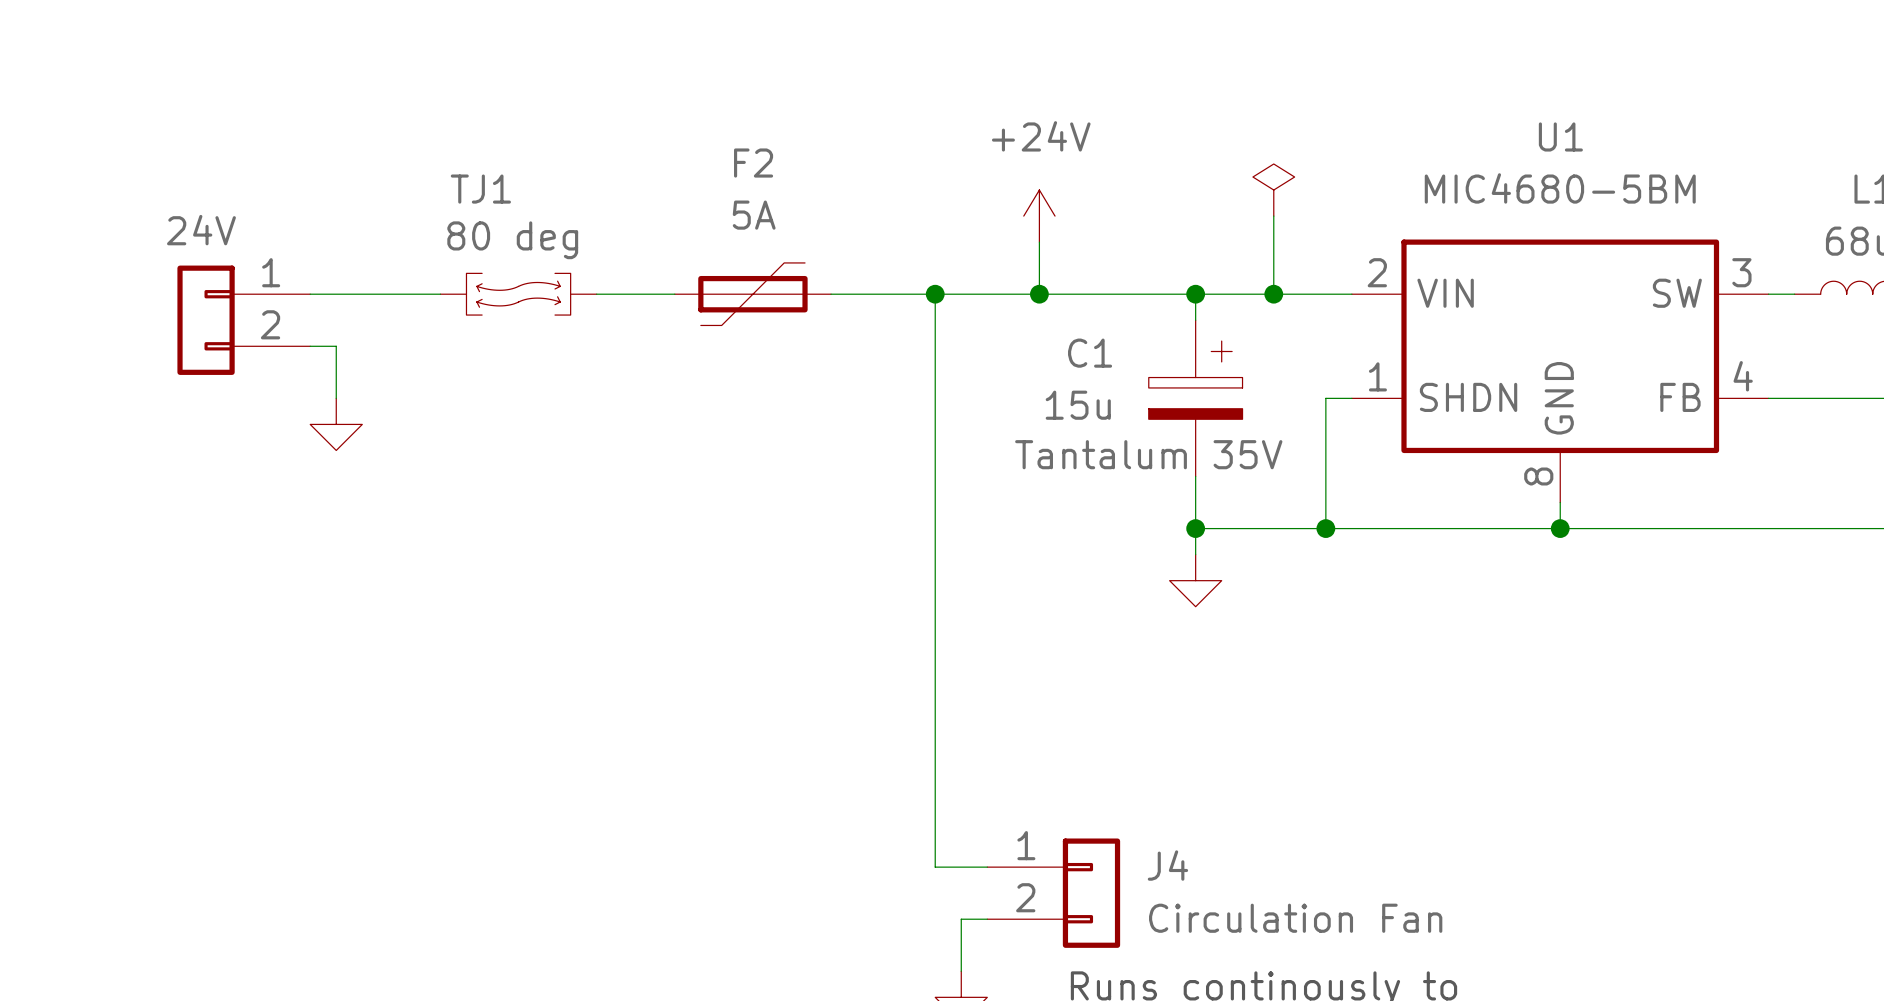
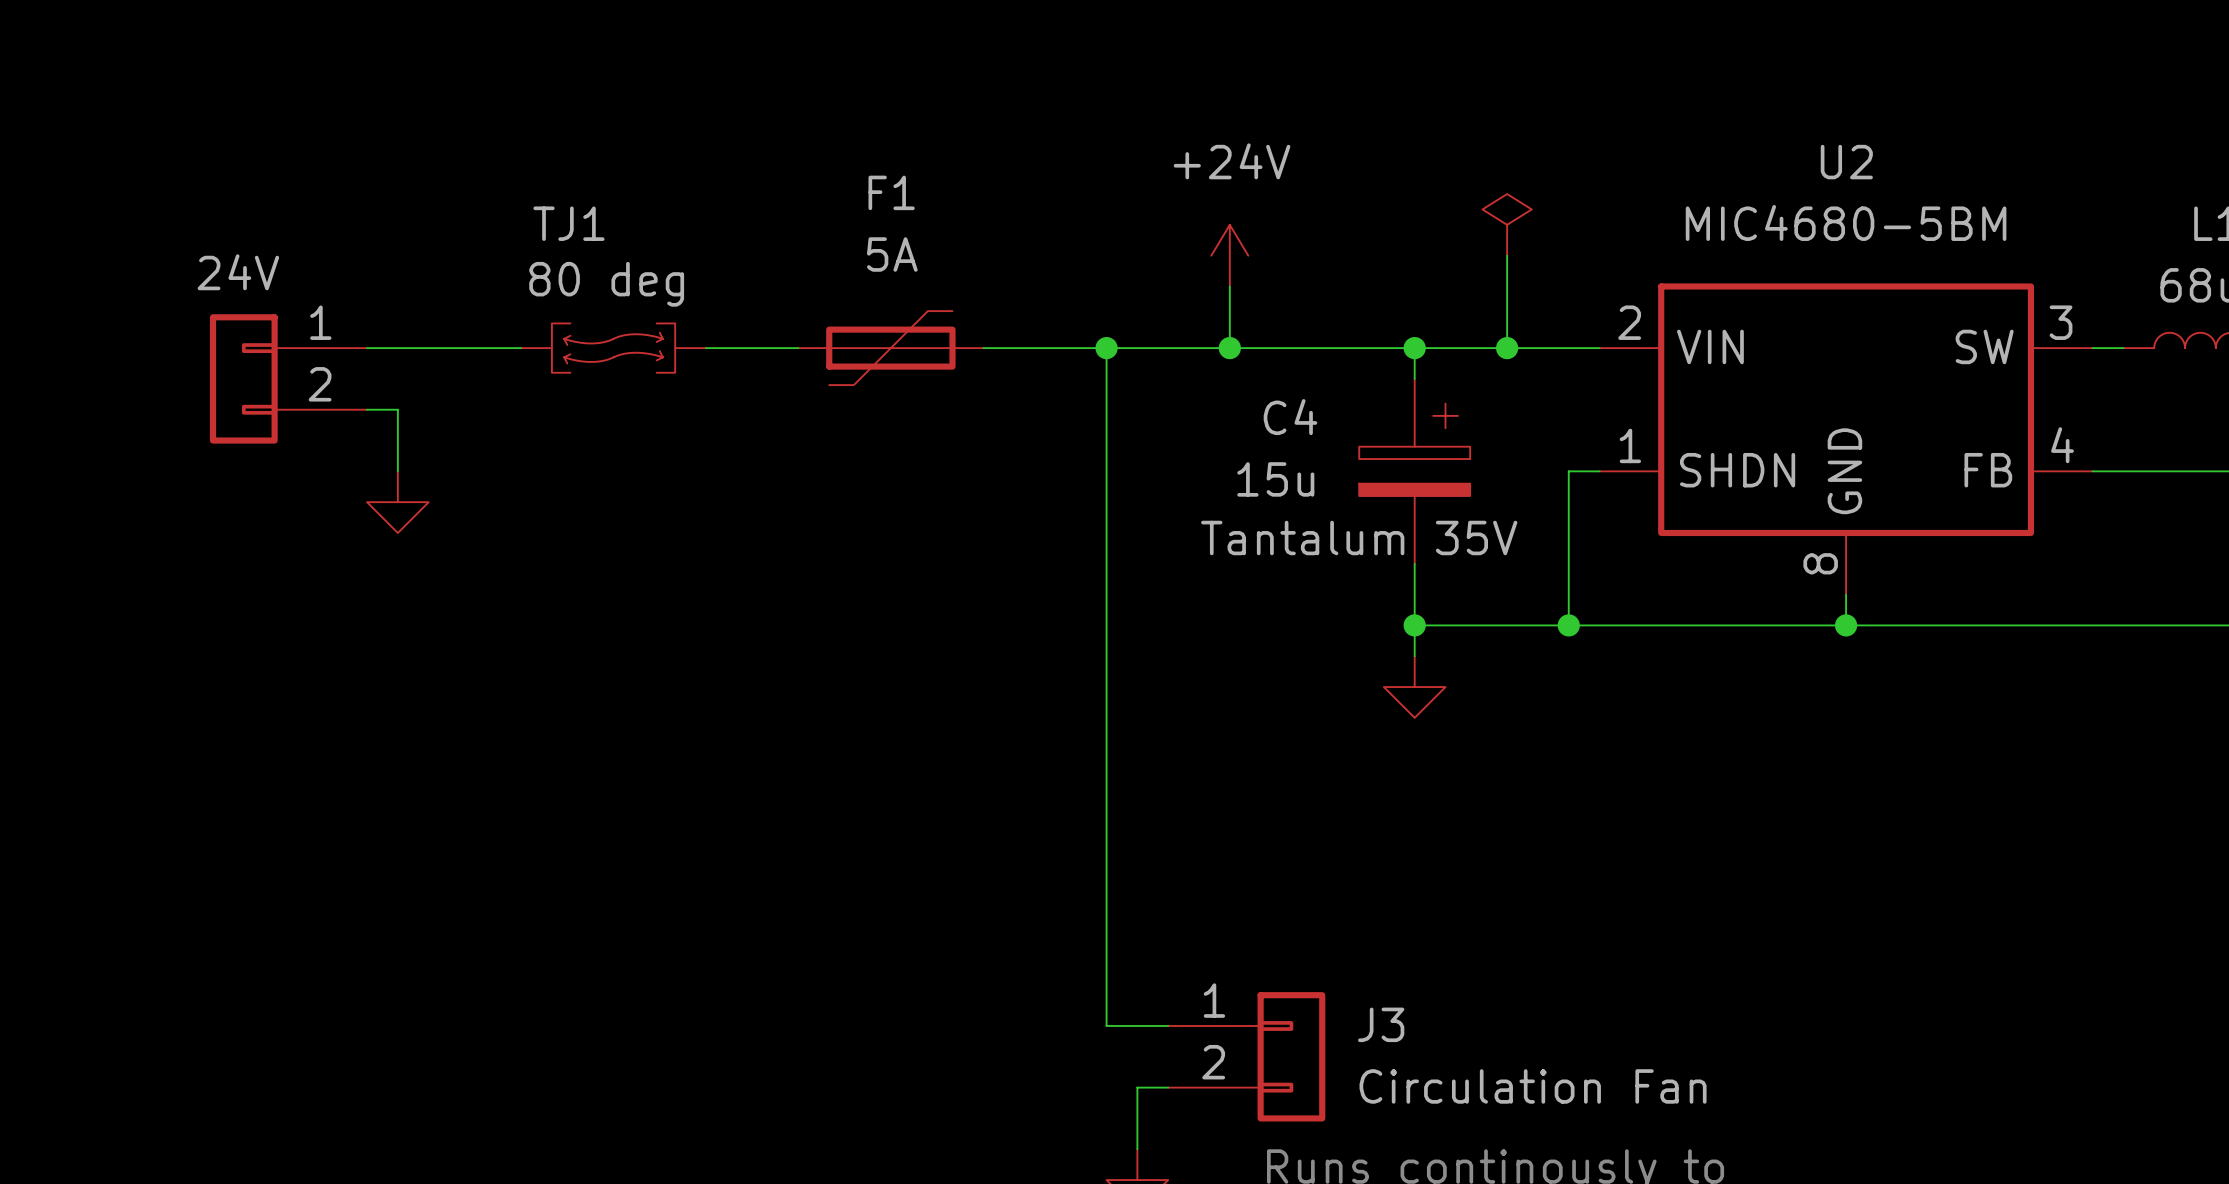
U1 name: U1 (1560, 136) -> U2 (1846, 162)
F2 name: F2 (753, 163) -> F1 (891, 192)
C1 name: C1 (1090, 353) -> C4 (1290, 417)
J4 name: J4 (1167, 865) -> J3 (1381, 1024)

